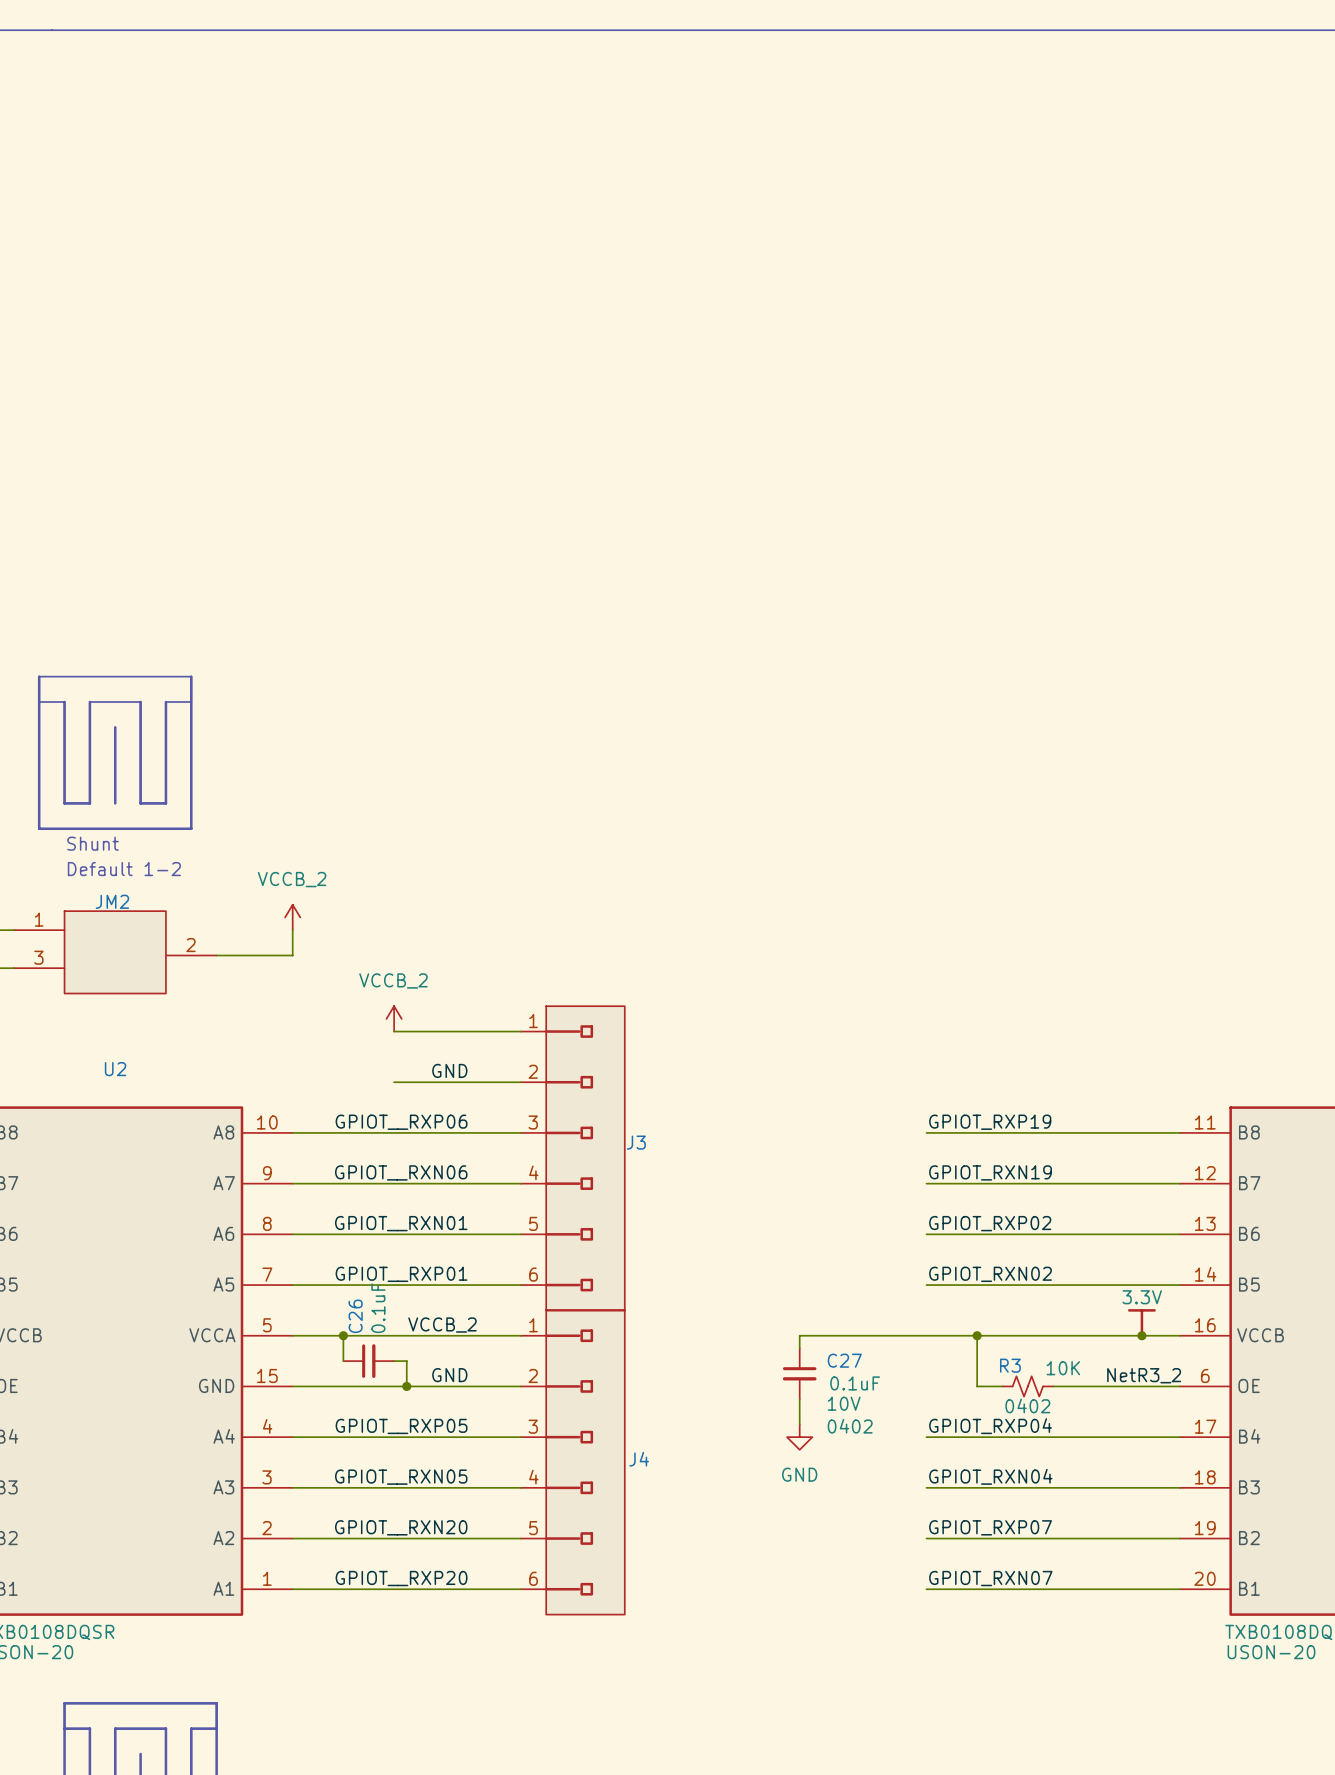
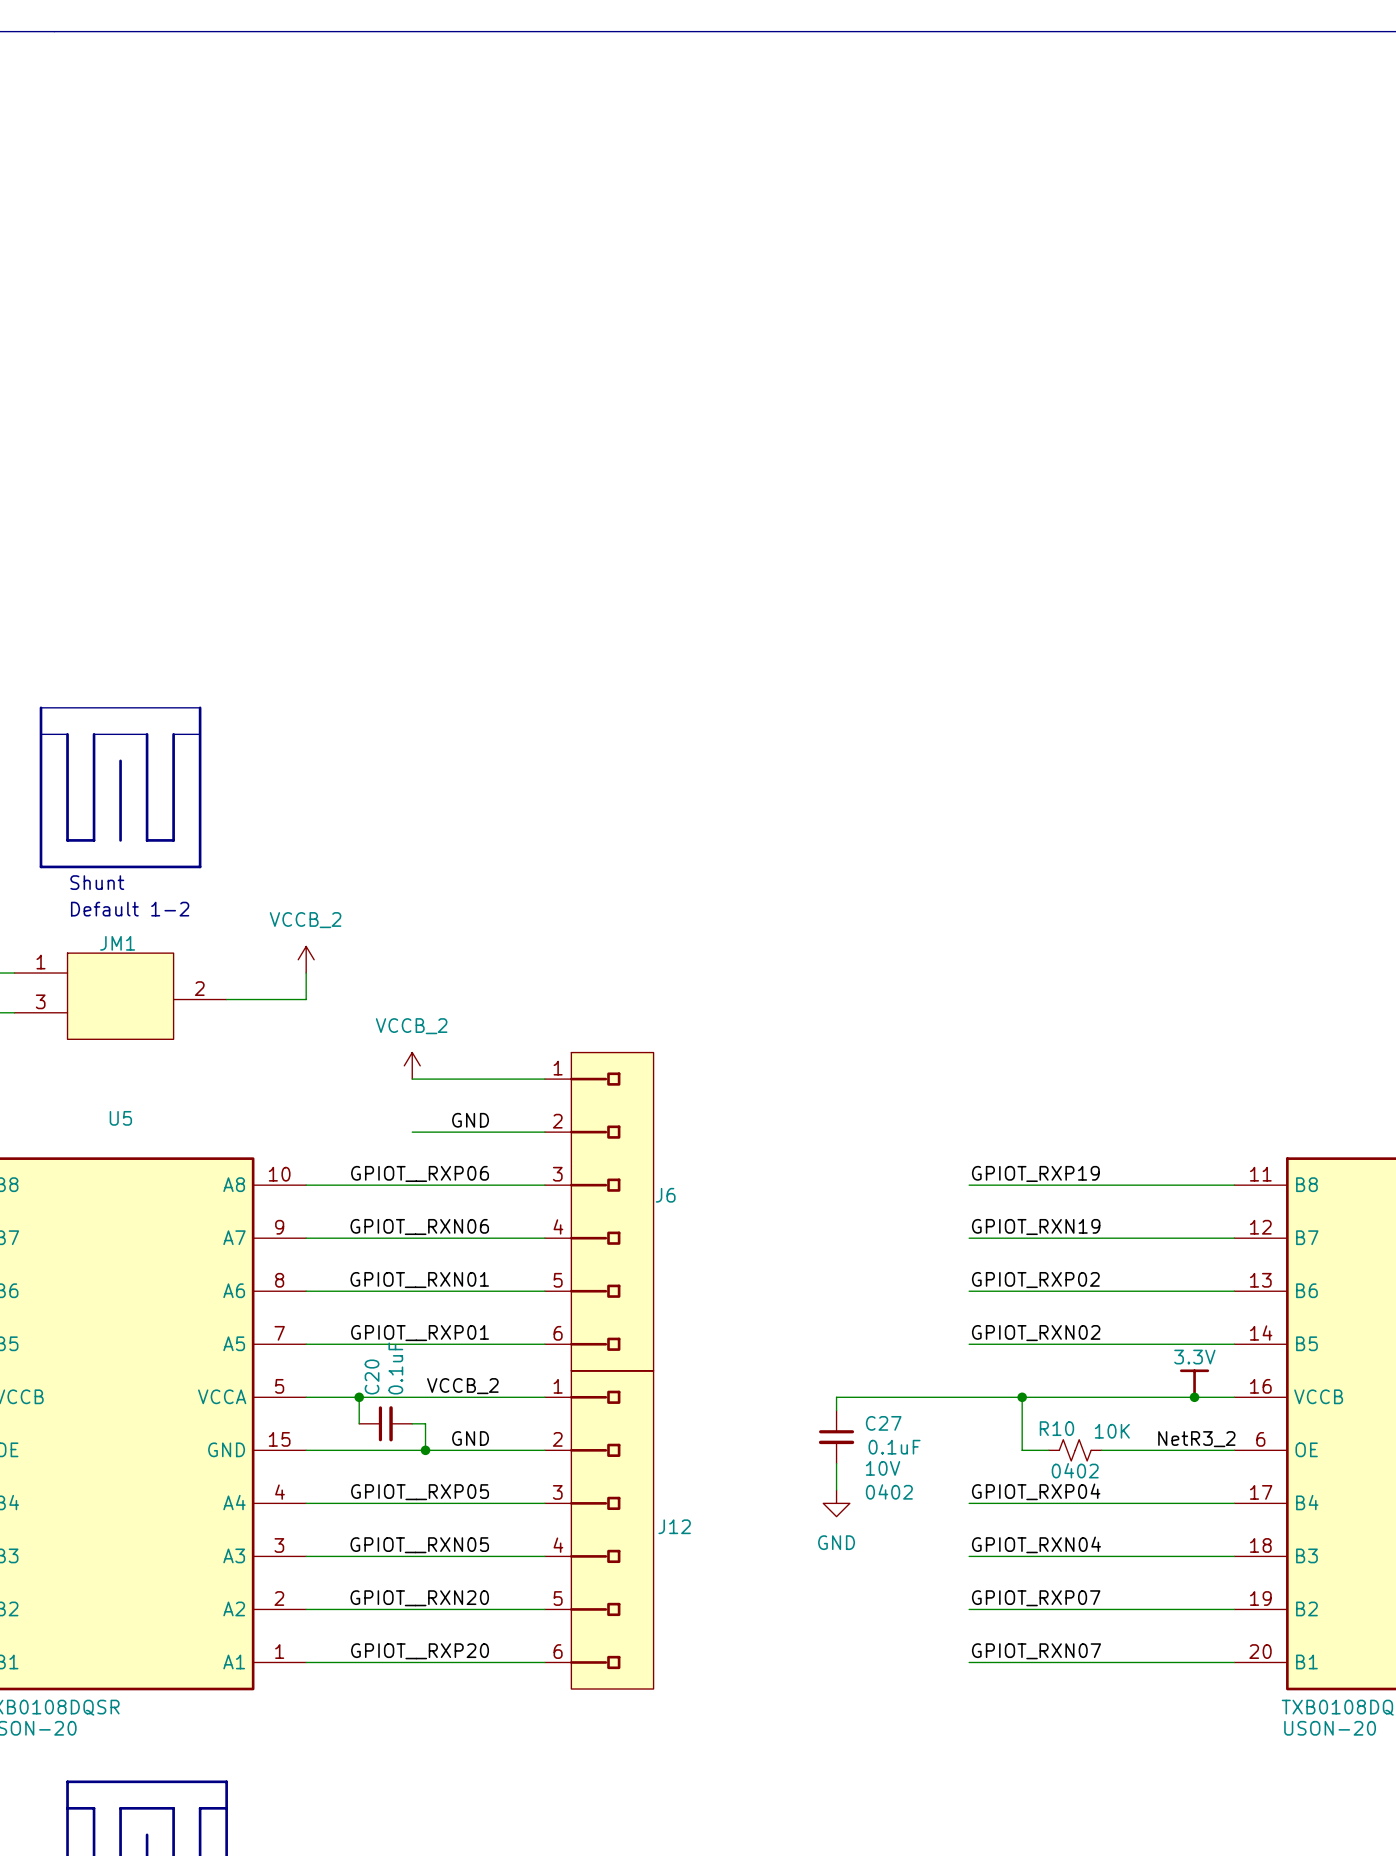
JM2 name: JM2 (112, 901) -> JM1 (117, 943)
U2 name: U2 (115, 1069) -> U5 (120, 1118)
J3 name: J3 (636, 1142) -> J6 (665, 1195)
C26 name: C26 (355, 1316) -> C20 (372, 1377)
R3 name: R3 (1010, 1365) -> R10 (1056, 1428)
J4 name: J4 (639, 1459) -> J12 (674, 1526)

